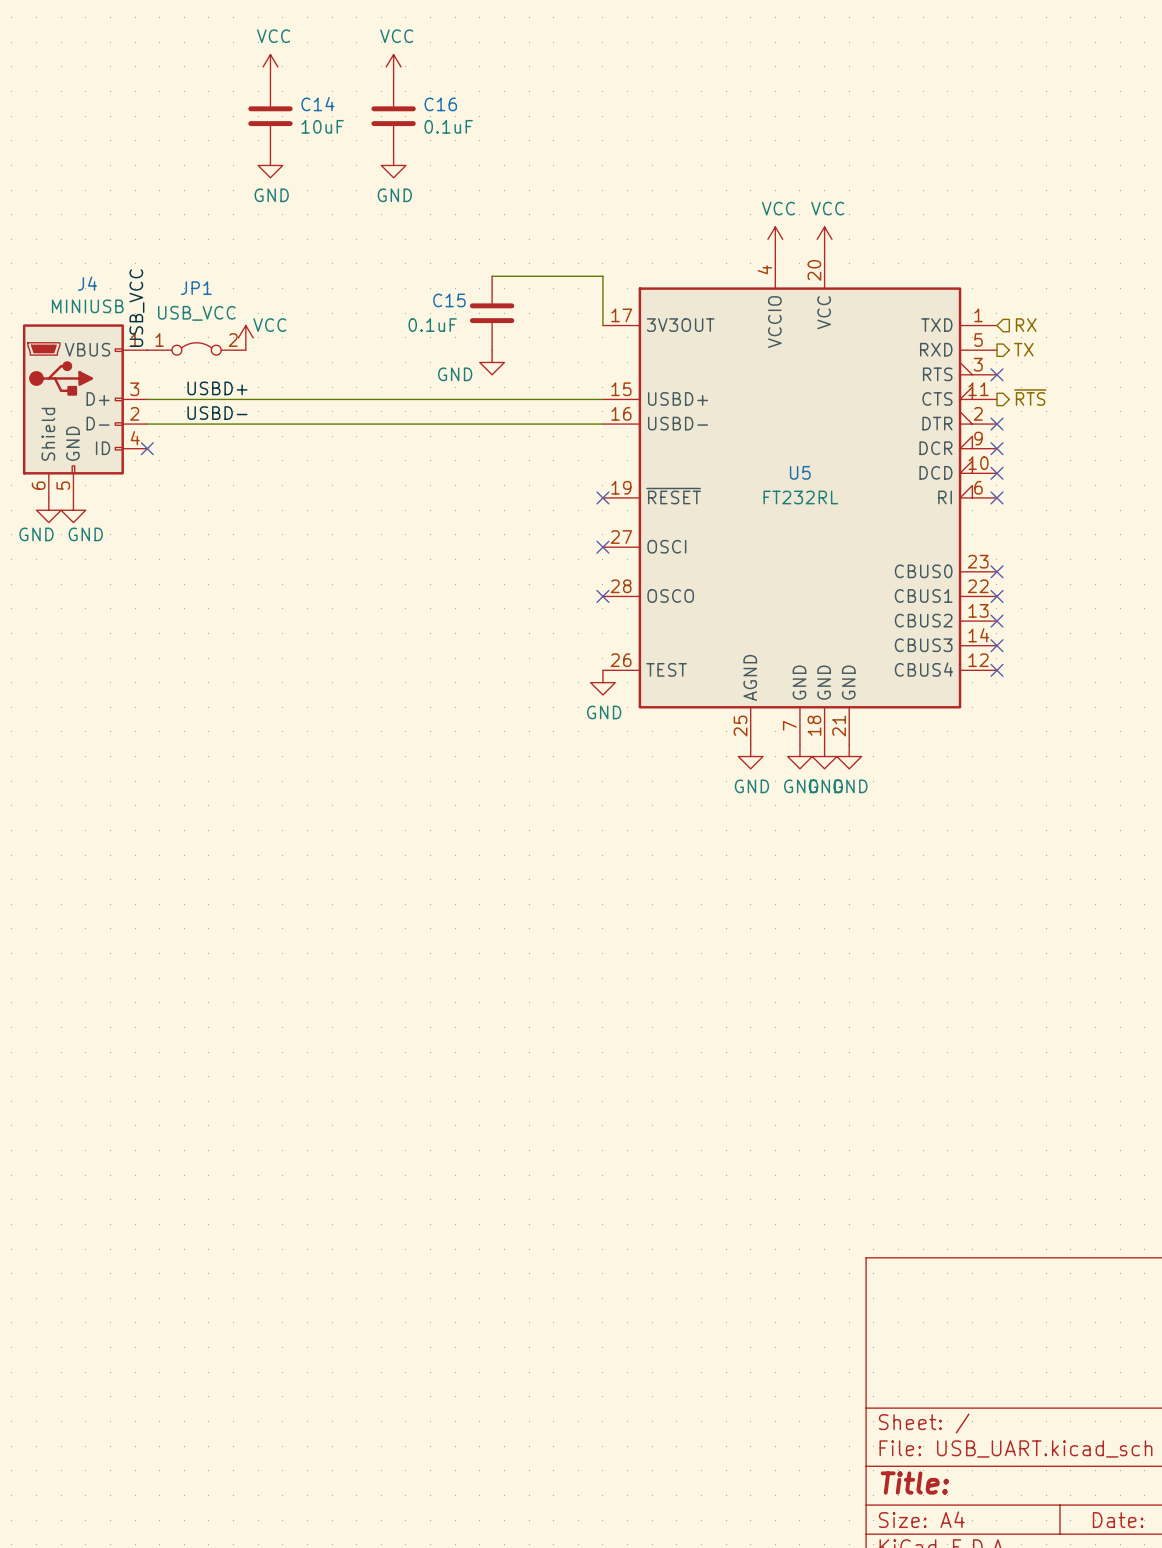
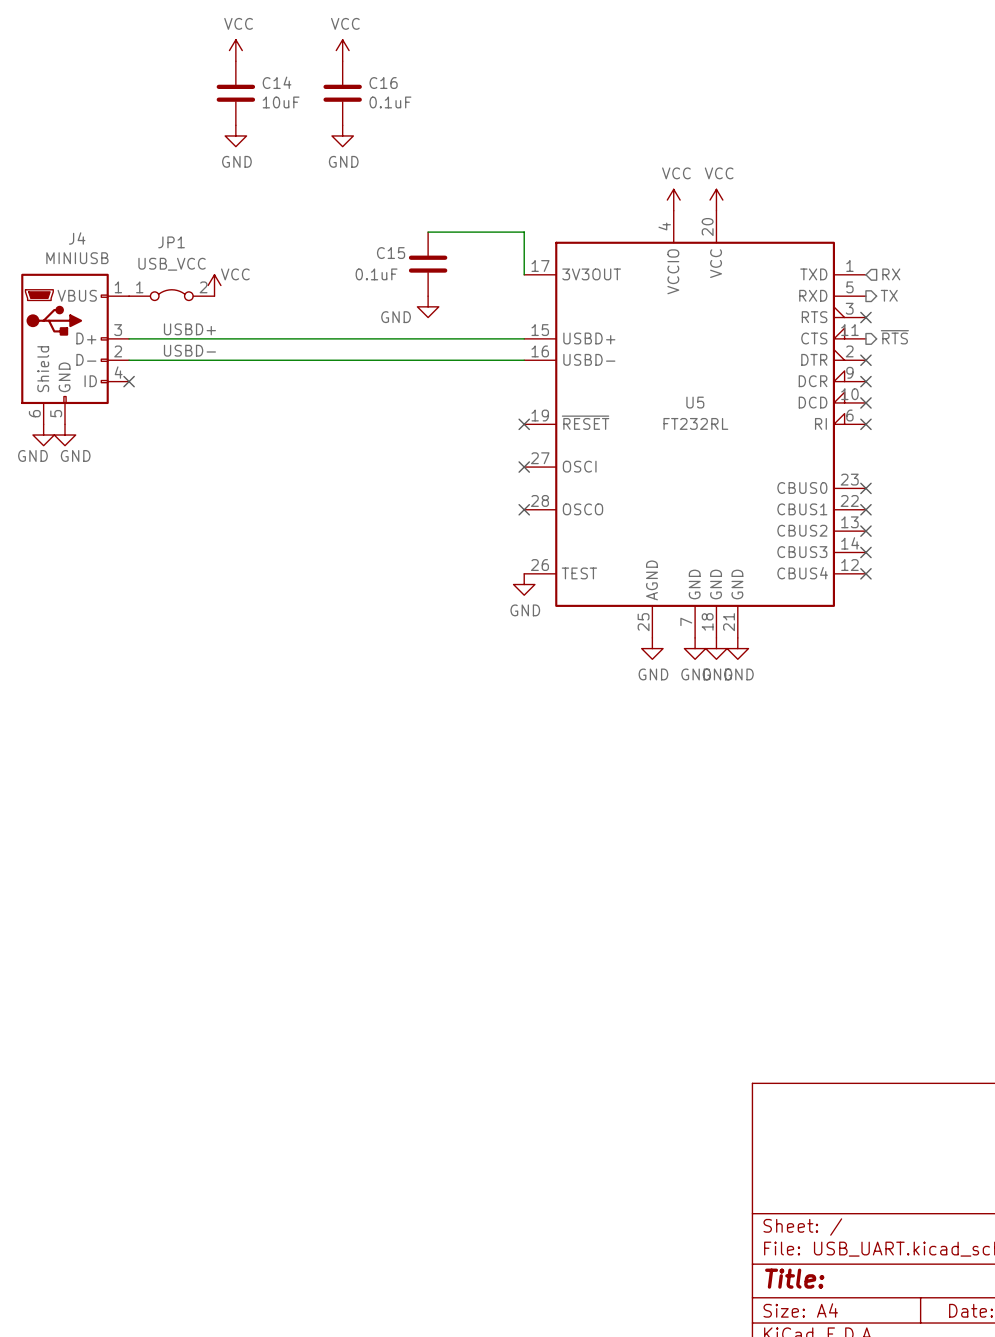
label: USB_VCC (136, 308) -> none

